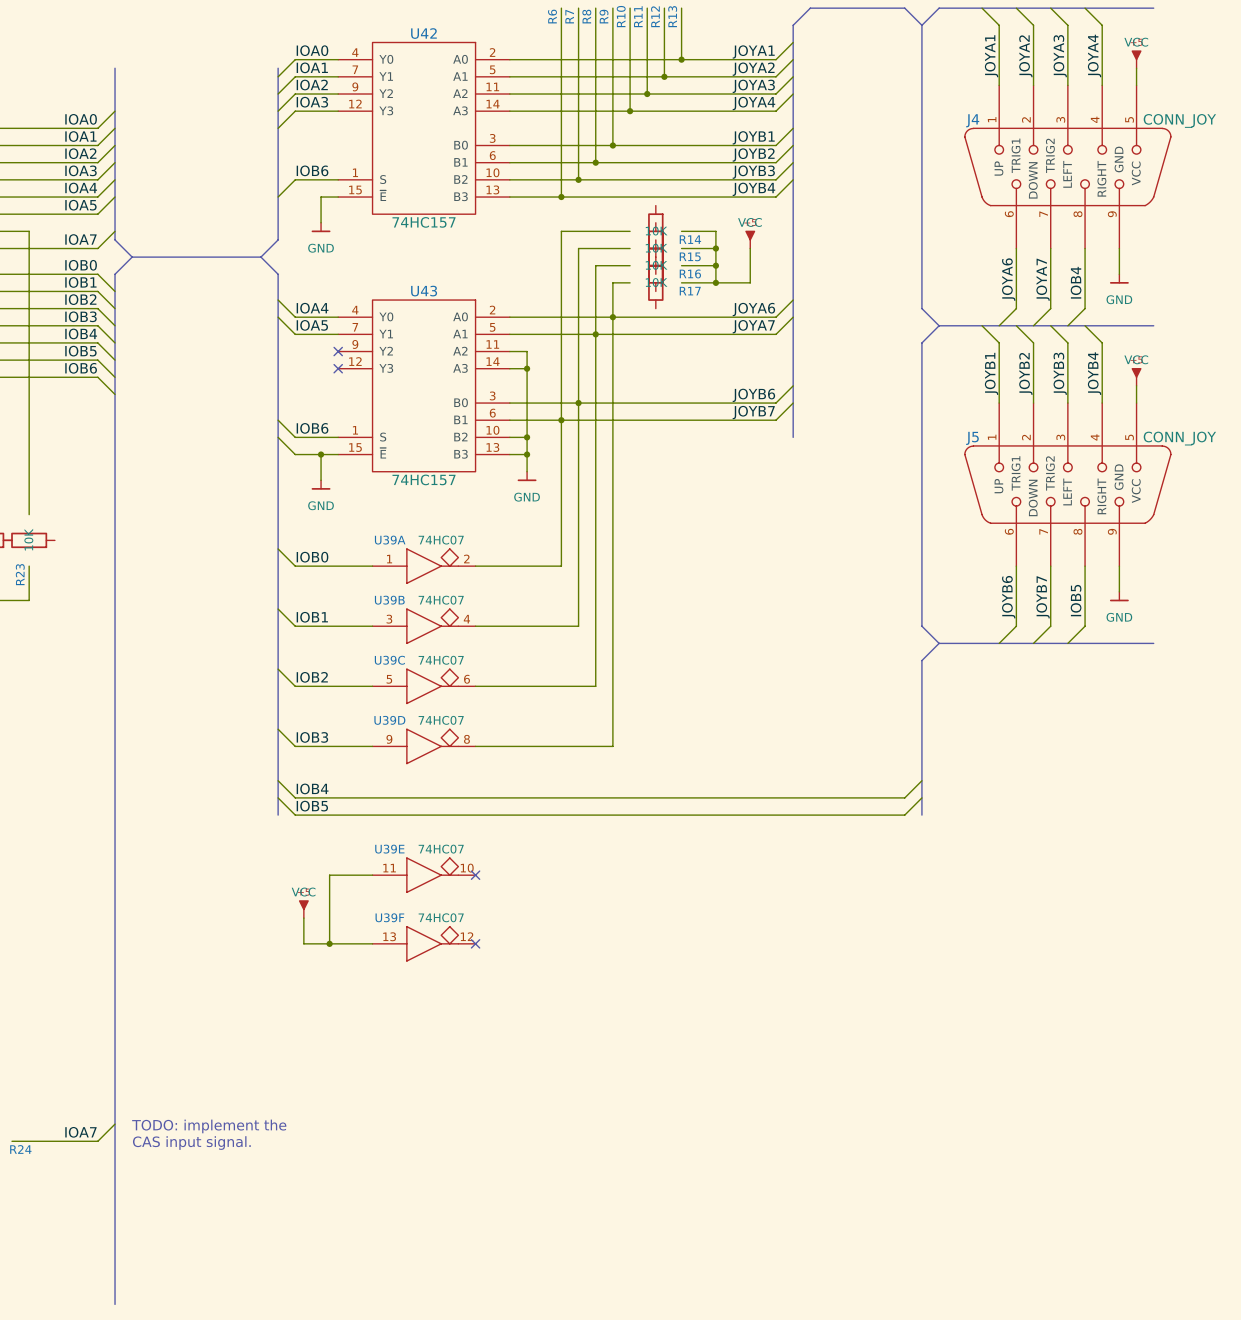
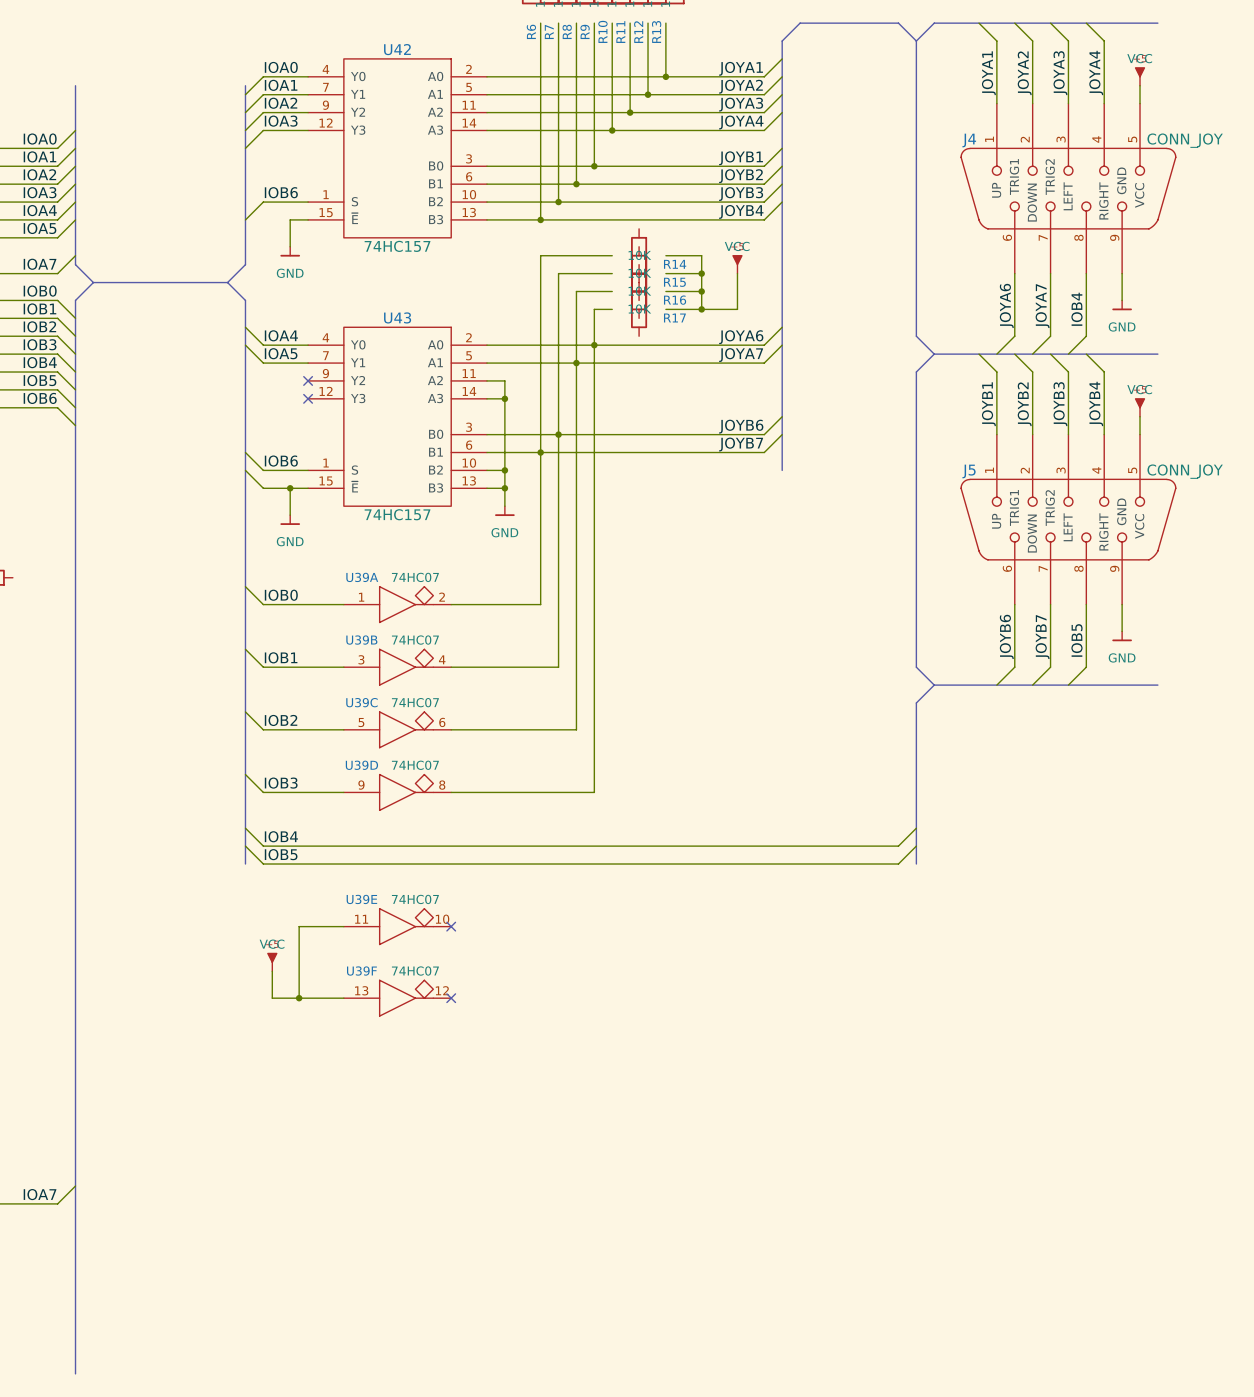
text: TODO: implement the (209, 1126) -> none
text: CAS input signal. (191, 1143) -> none

